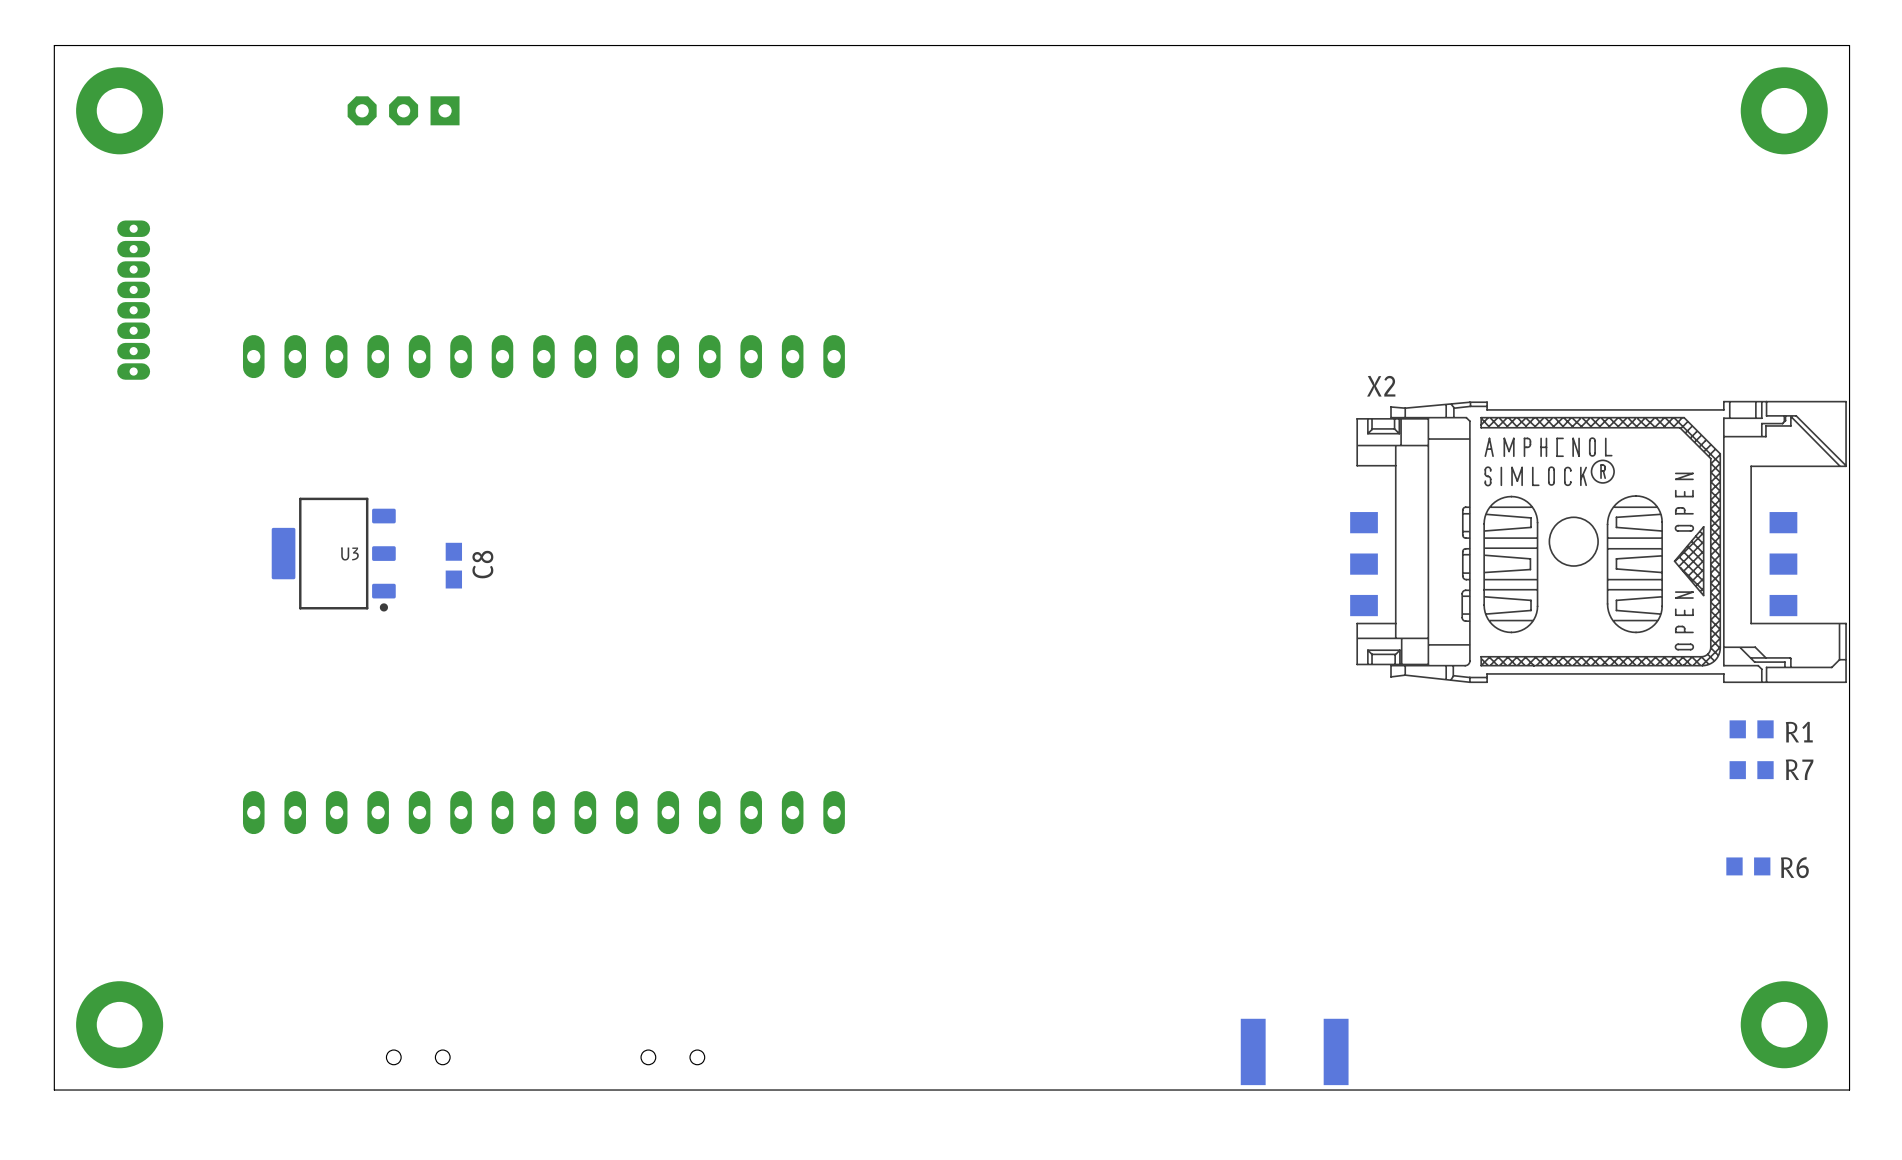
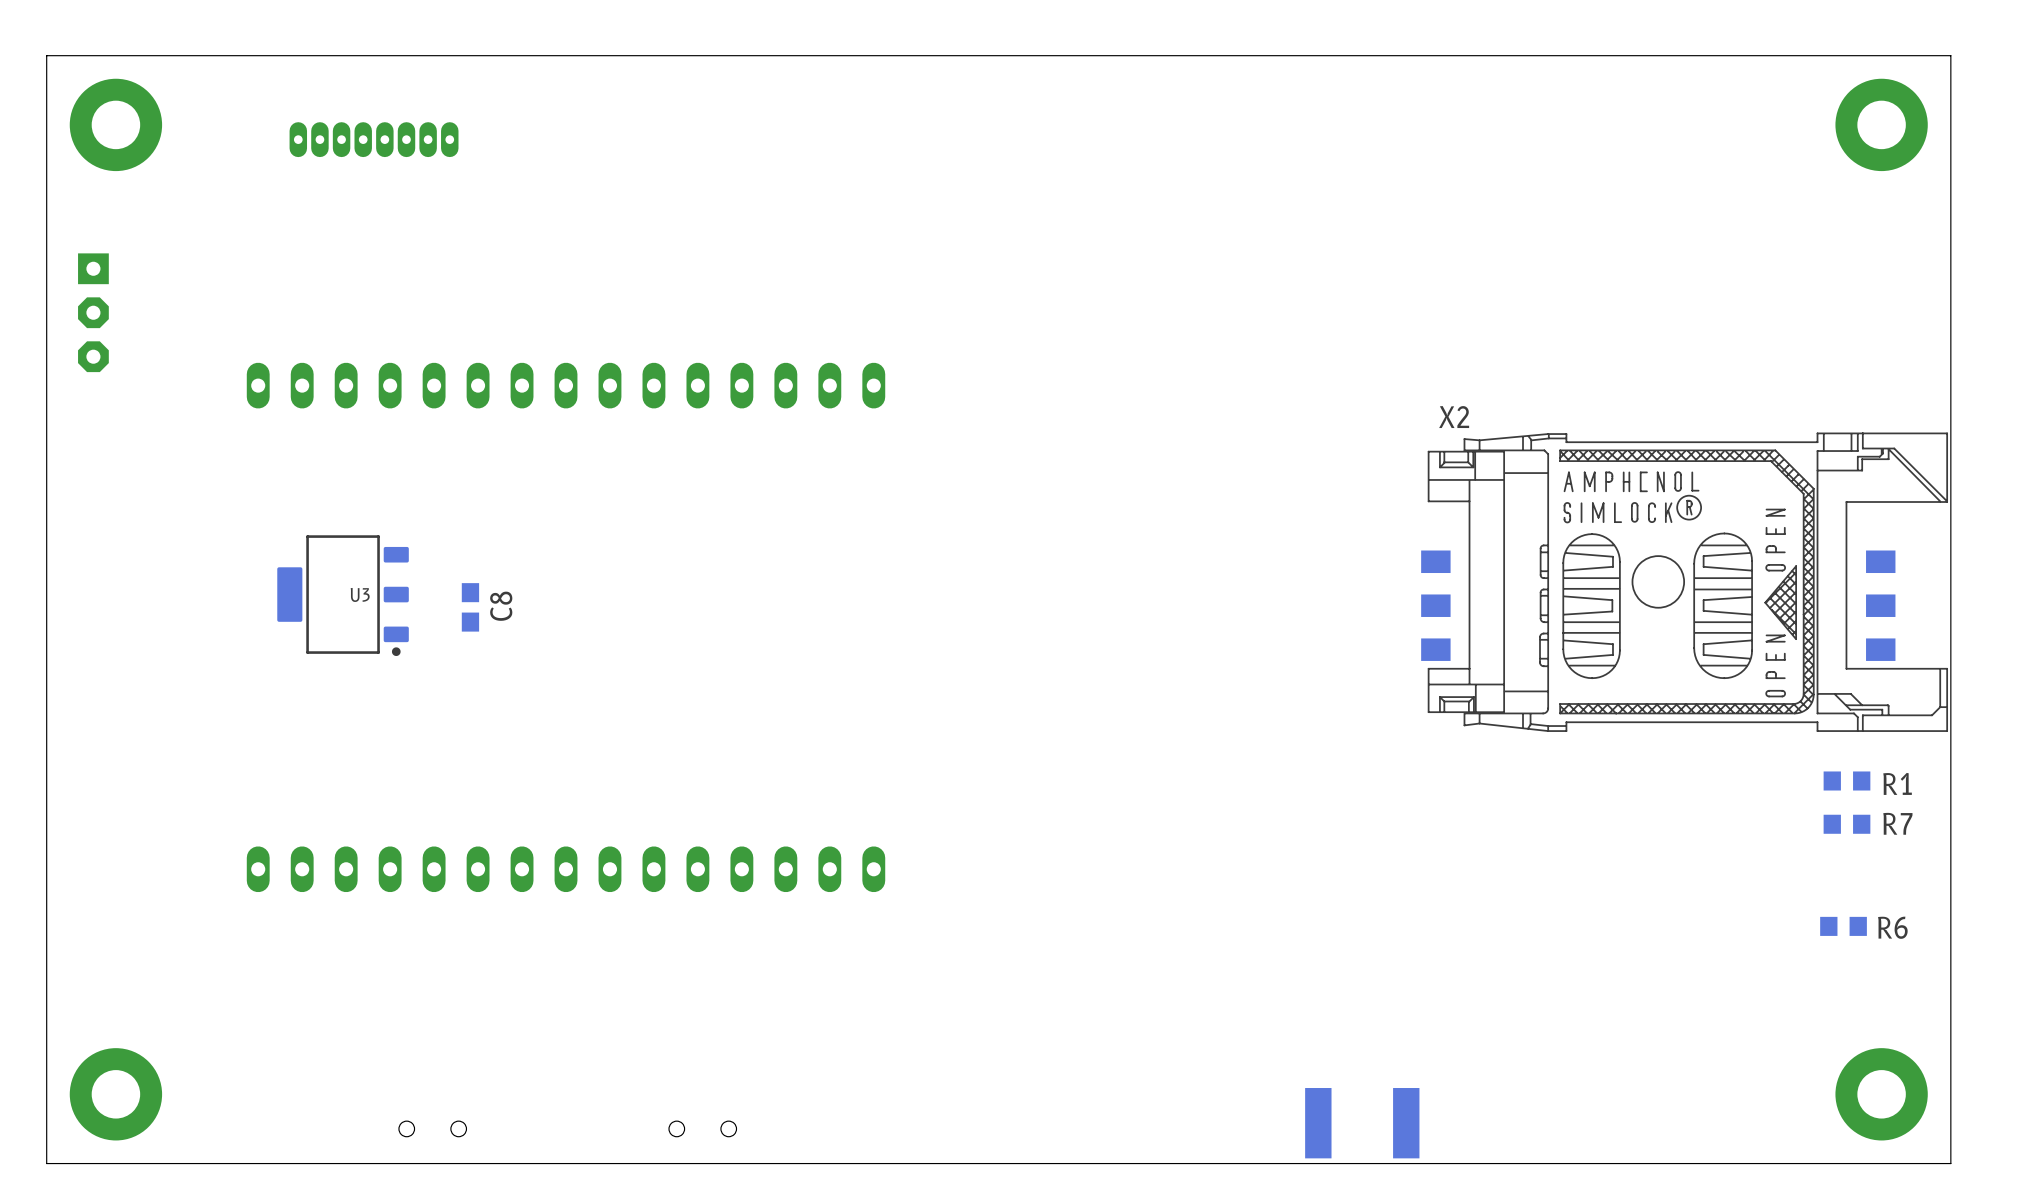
part rotation: 0° (403, 110) -> 90° counterclockwise (93, 312)
part position: (403, 110) -> (93, 312)
part rotation: 0° (133, 300) -> 90° clockwise (374, 139)
part position: (133, 300) -> (374, 139)

